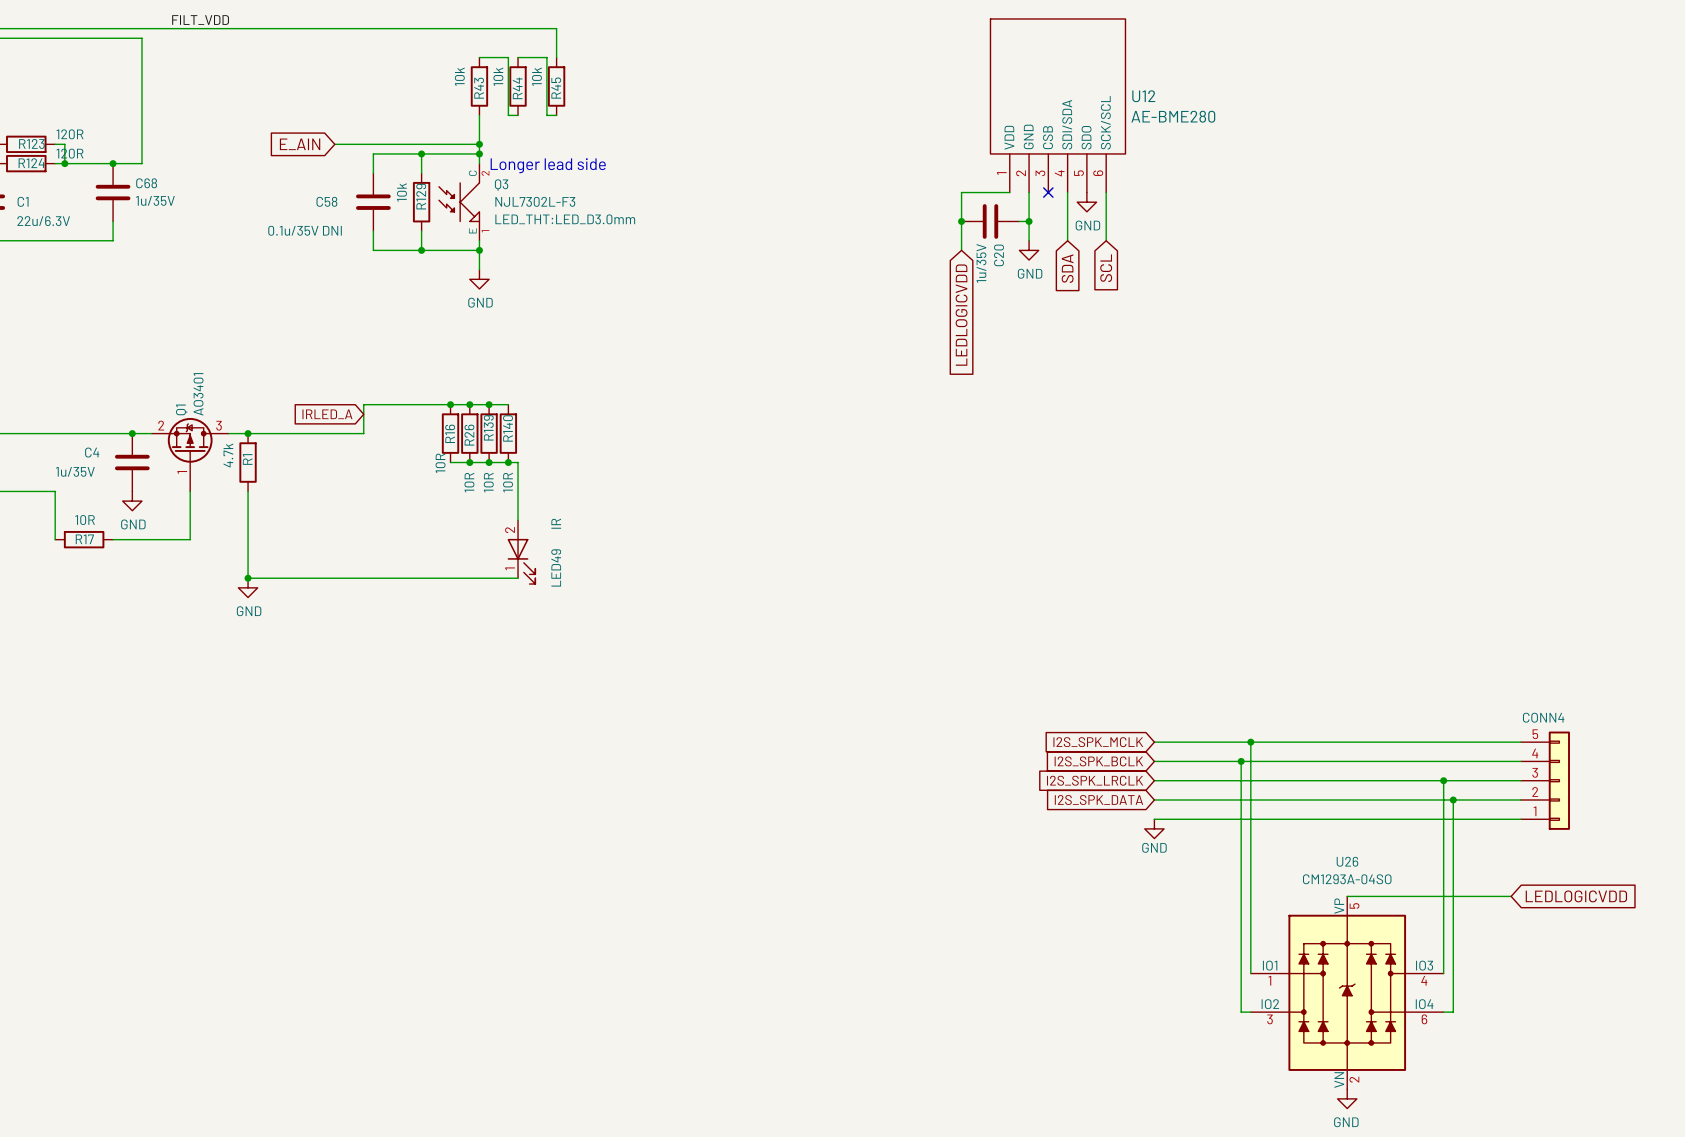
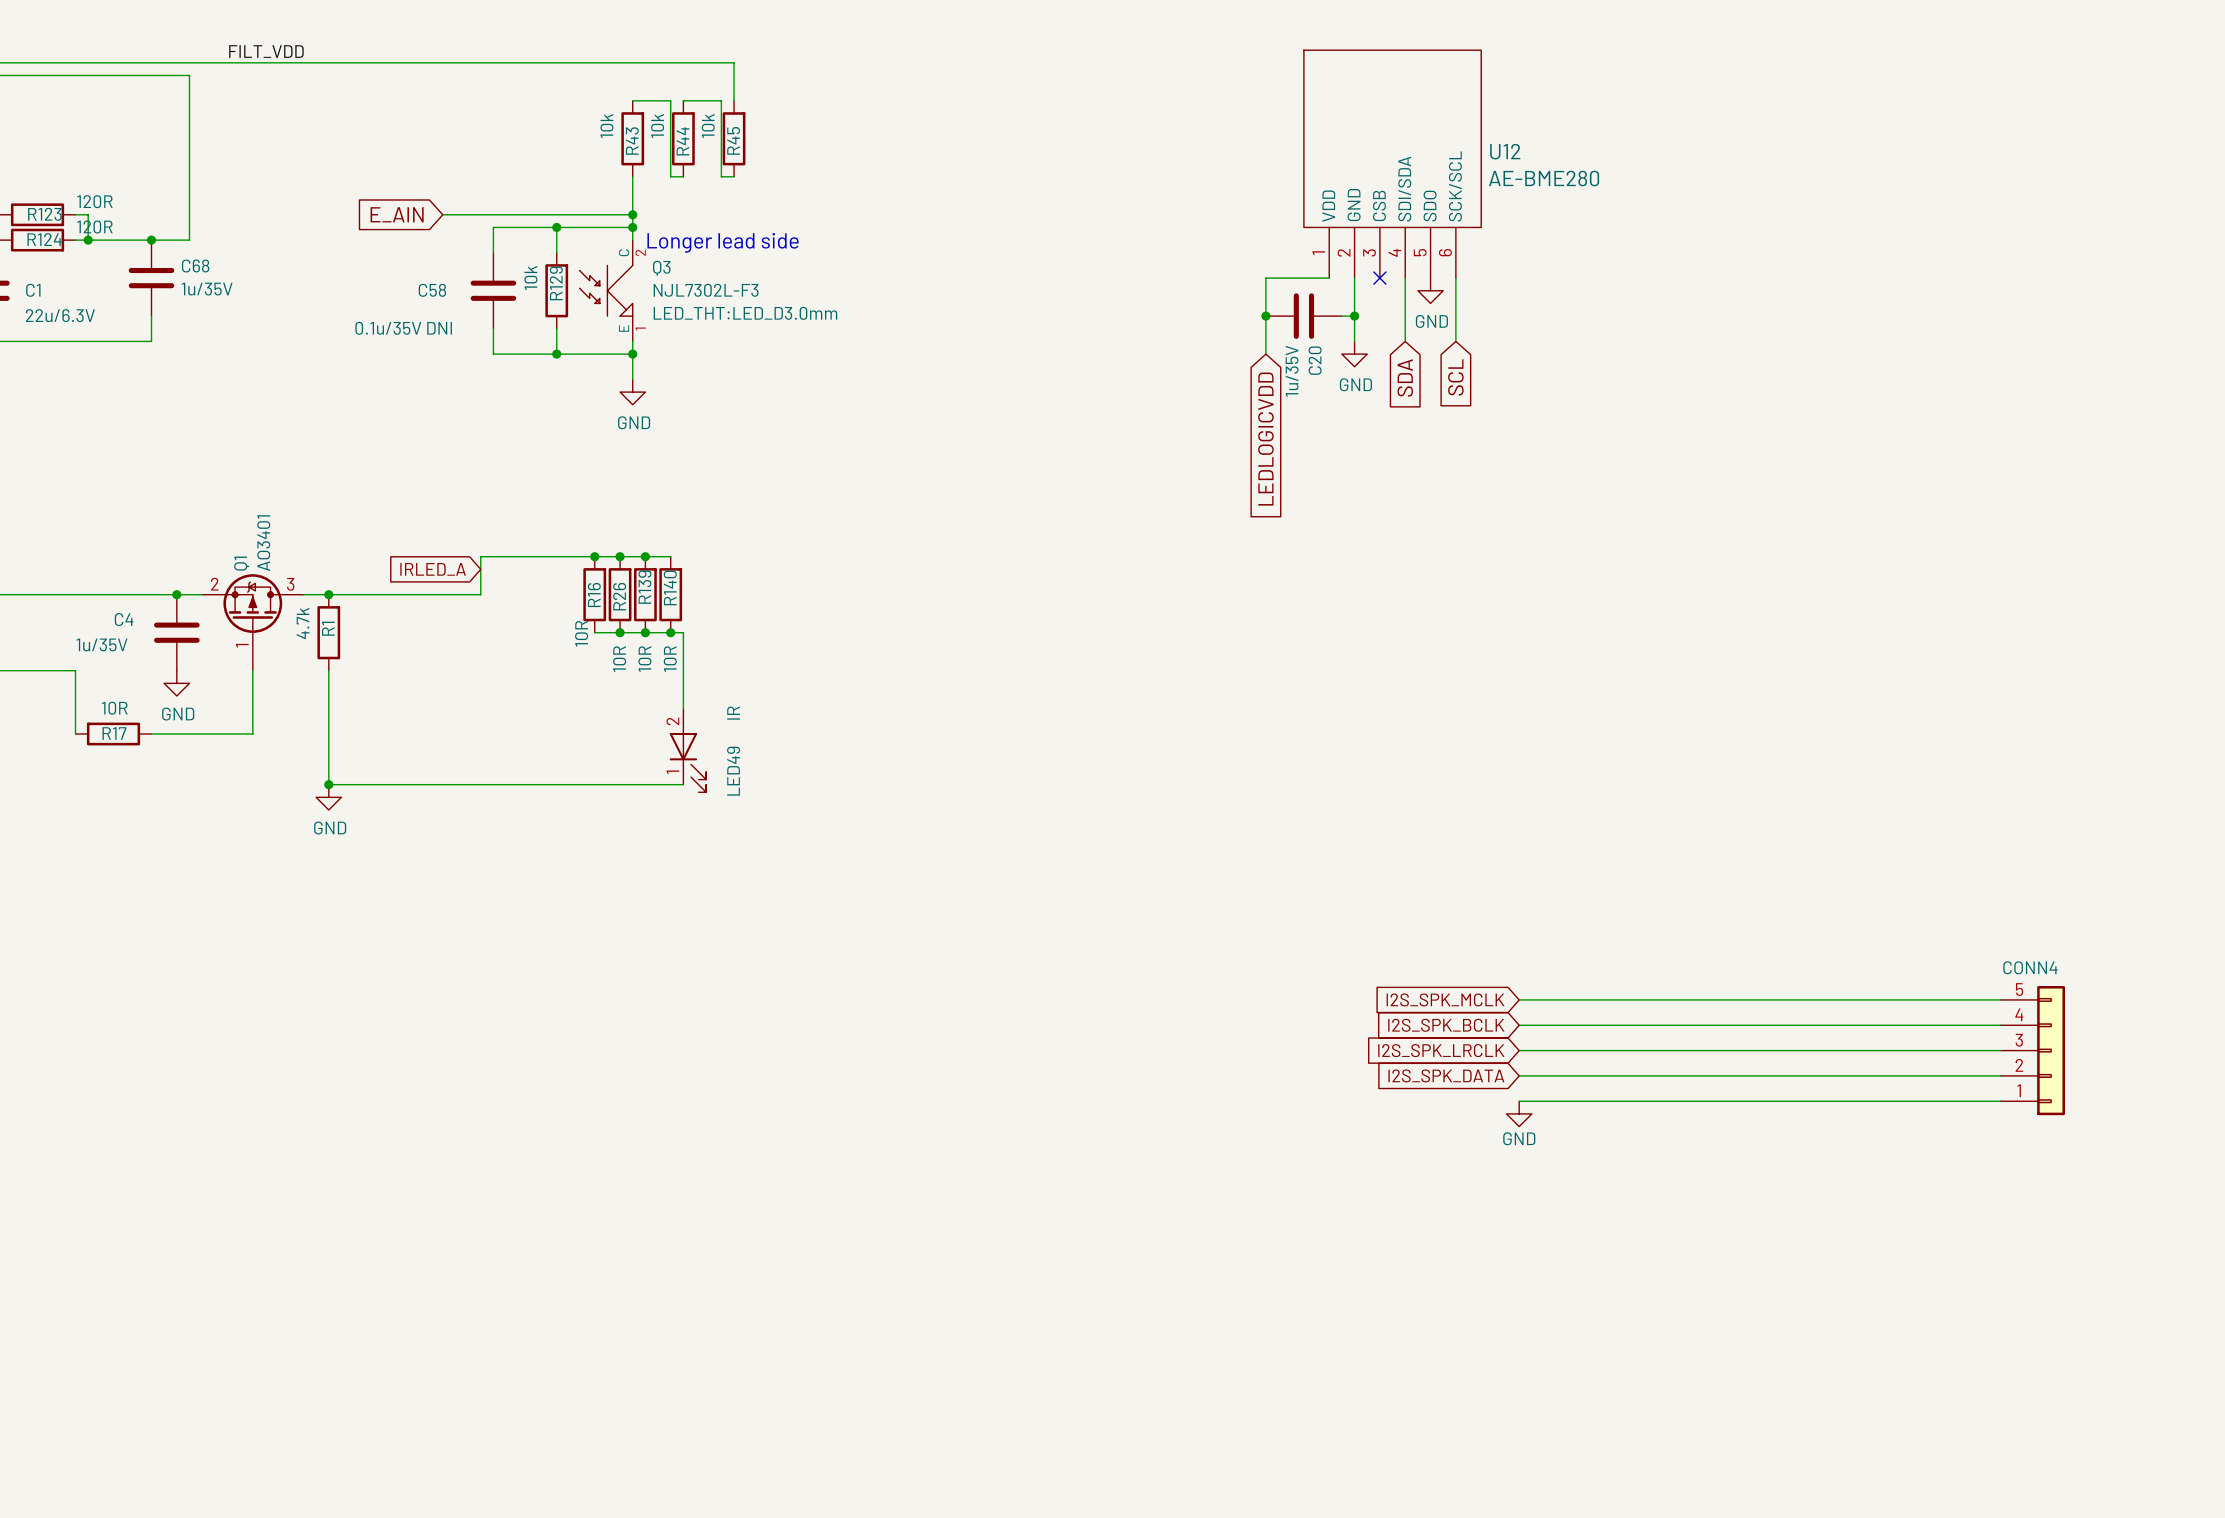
wire: (1250, 742) (1250, 973) -> none
junction: (1250, 742) -> none
wire: (1241, 761) (1241, 1012) (1250, 1012) -> none
junction: (1241, 761) -> none
wire: (1443, 780) (1443, 973) -> none
junction: (1443, 780) -> none
wire: (1453, 800) (1453, 1012) (1443, 1012) -> none
junction: (1453, 800) -> none
wire: (1347, 896) (1511, 896) -> none
global label: LEDLOGICVDD (1576, 896) -> none
U26: CM1293A-04SO (1347, 992) -> none
power symbol: GND (1347, 1098) -> none

